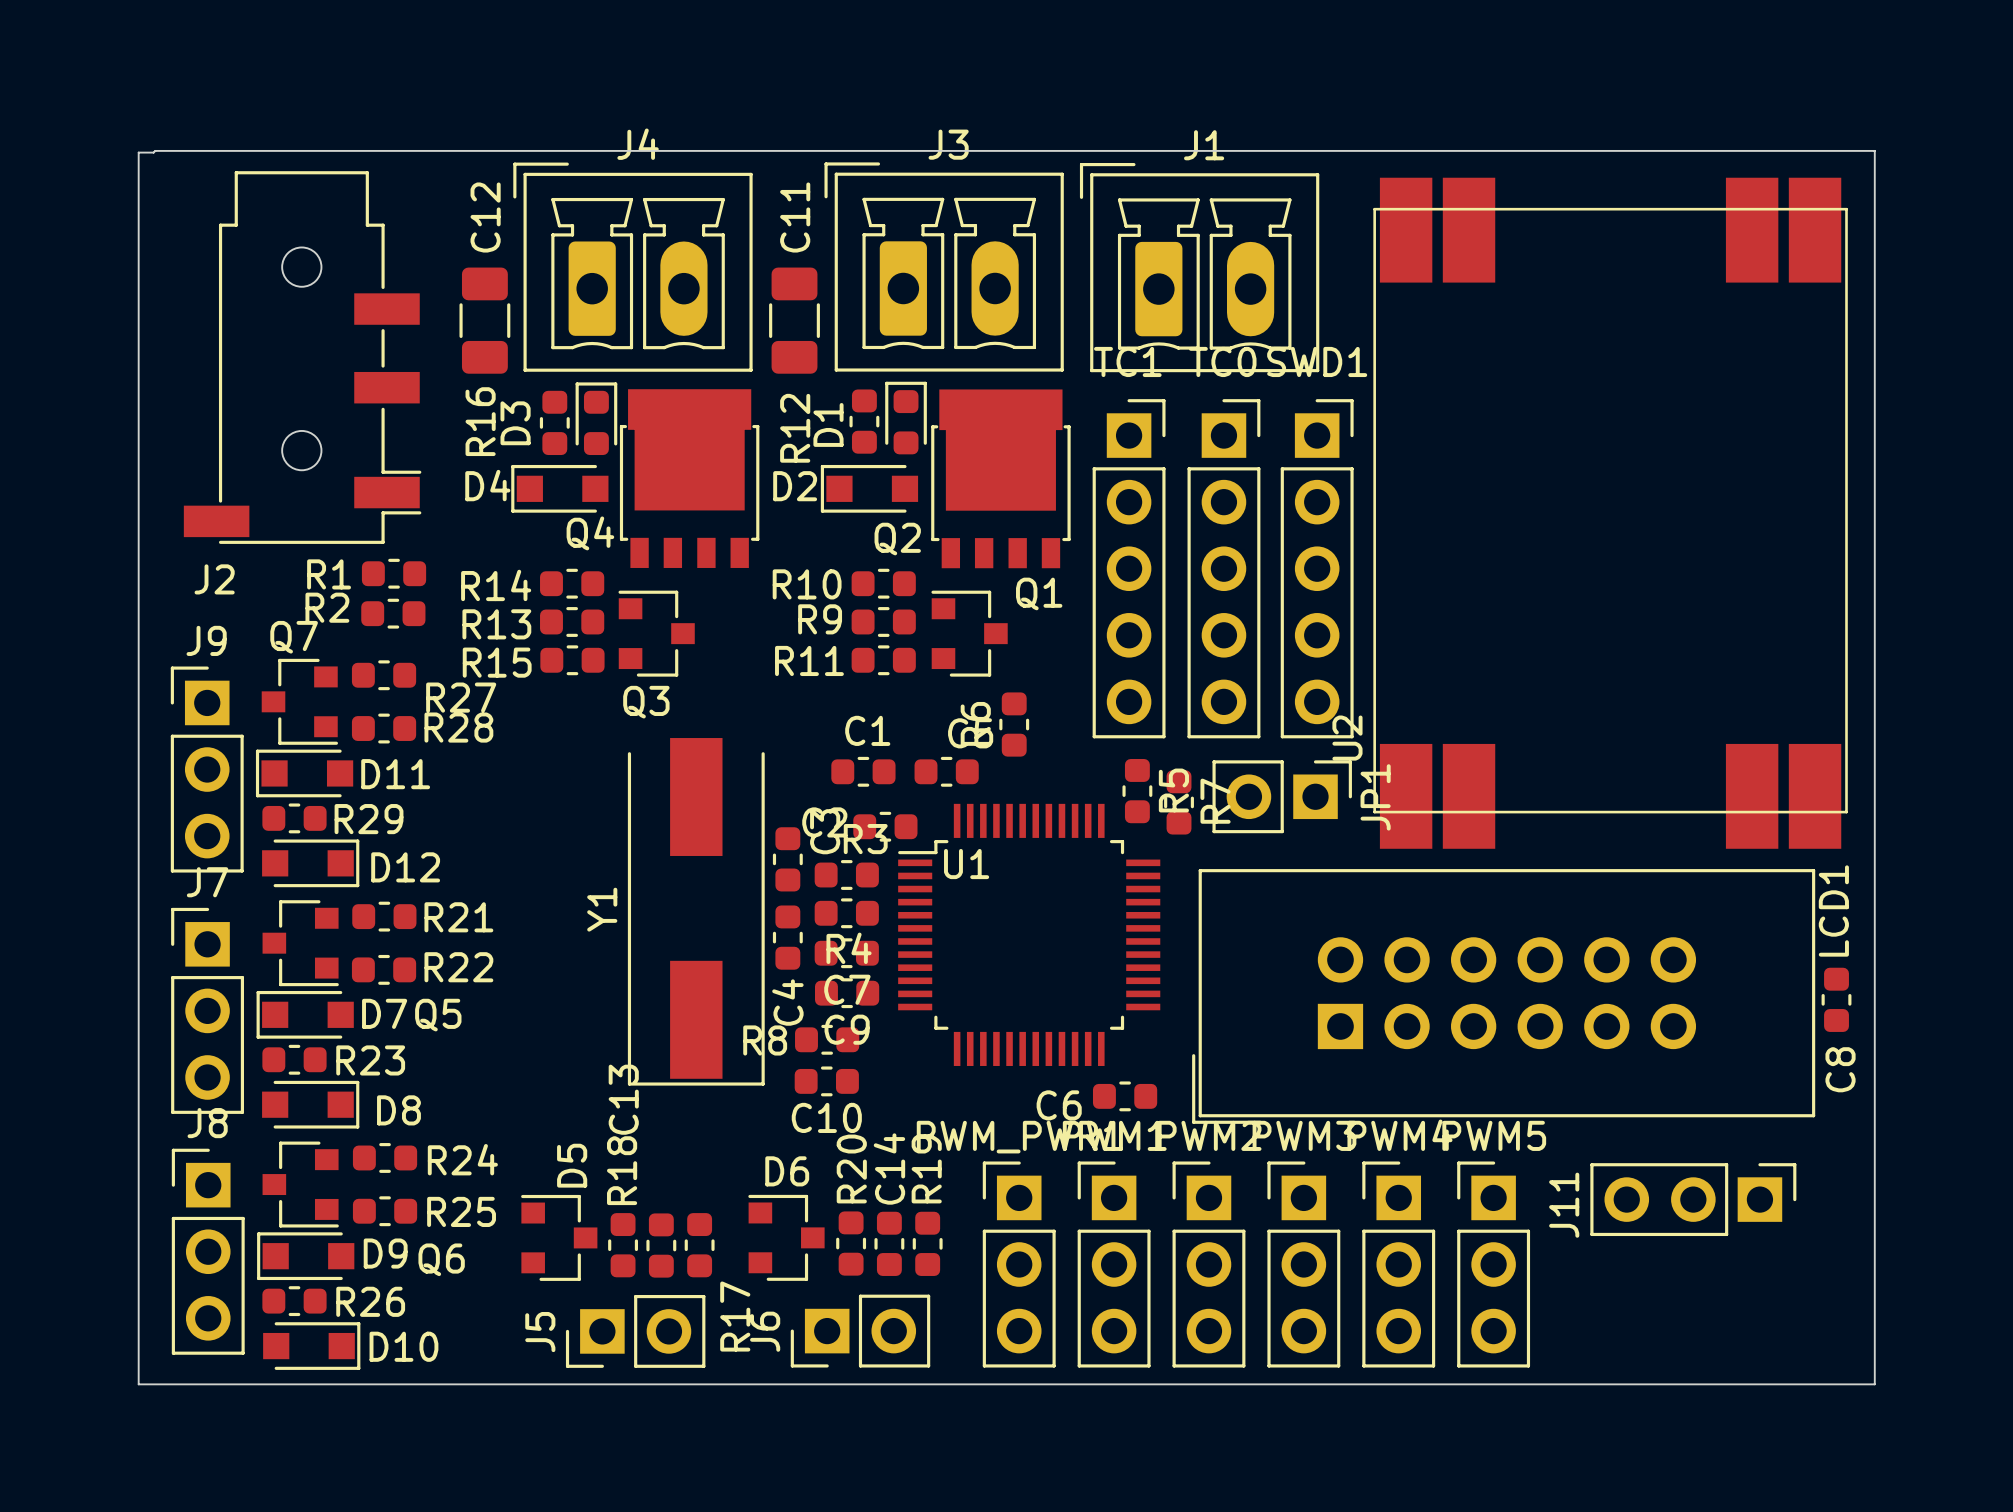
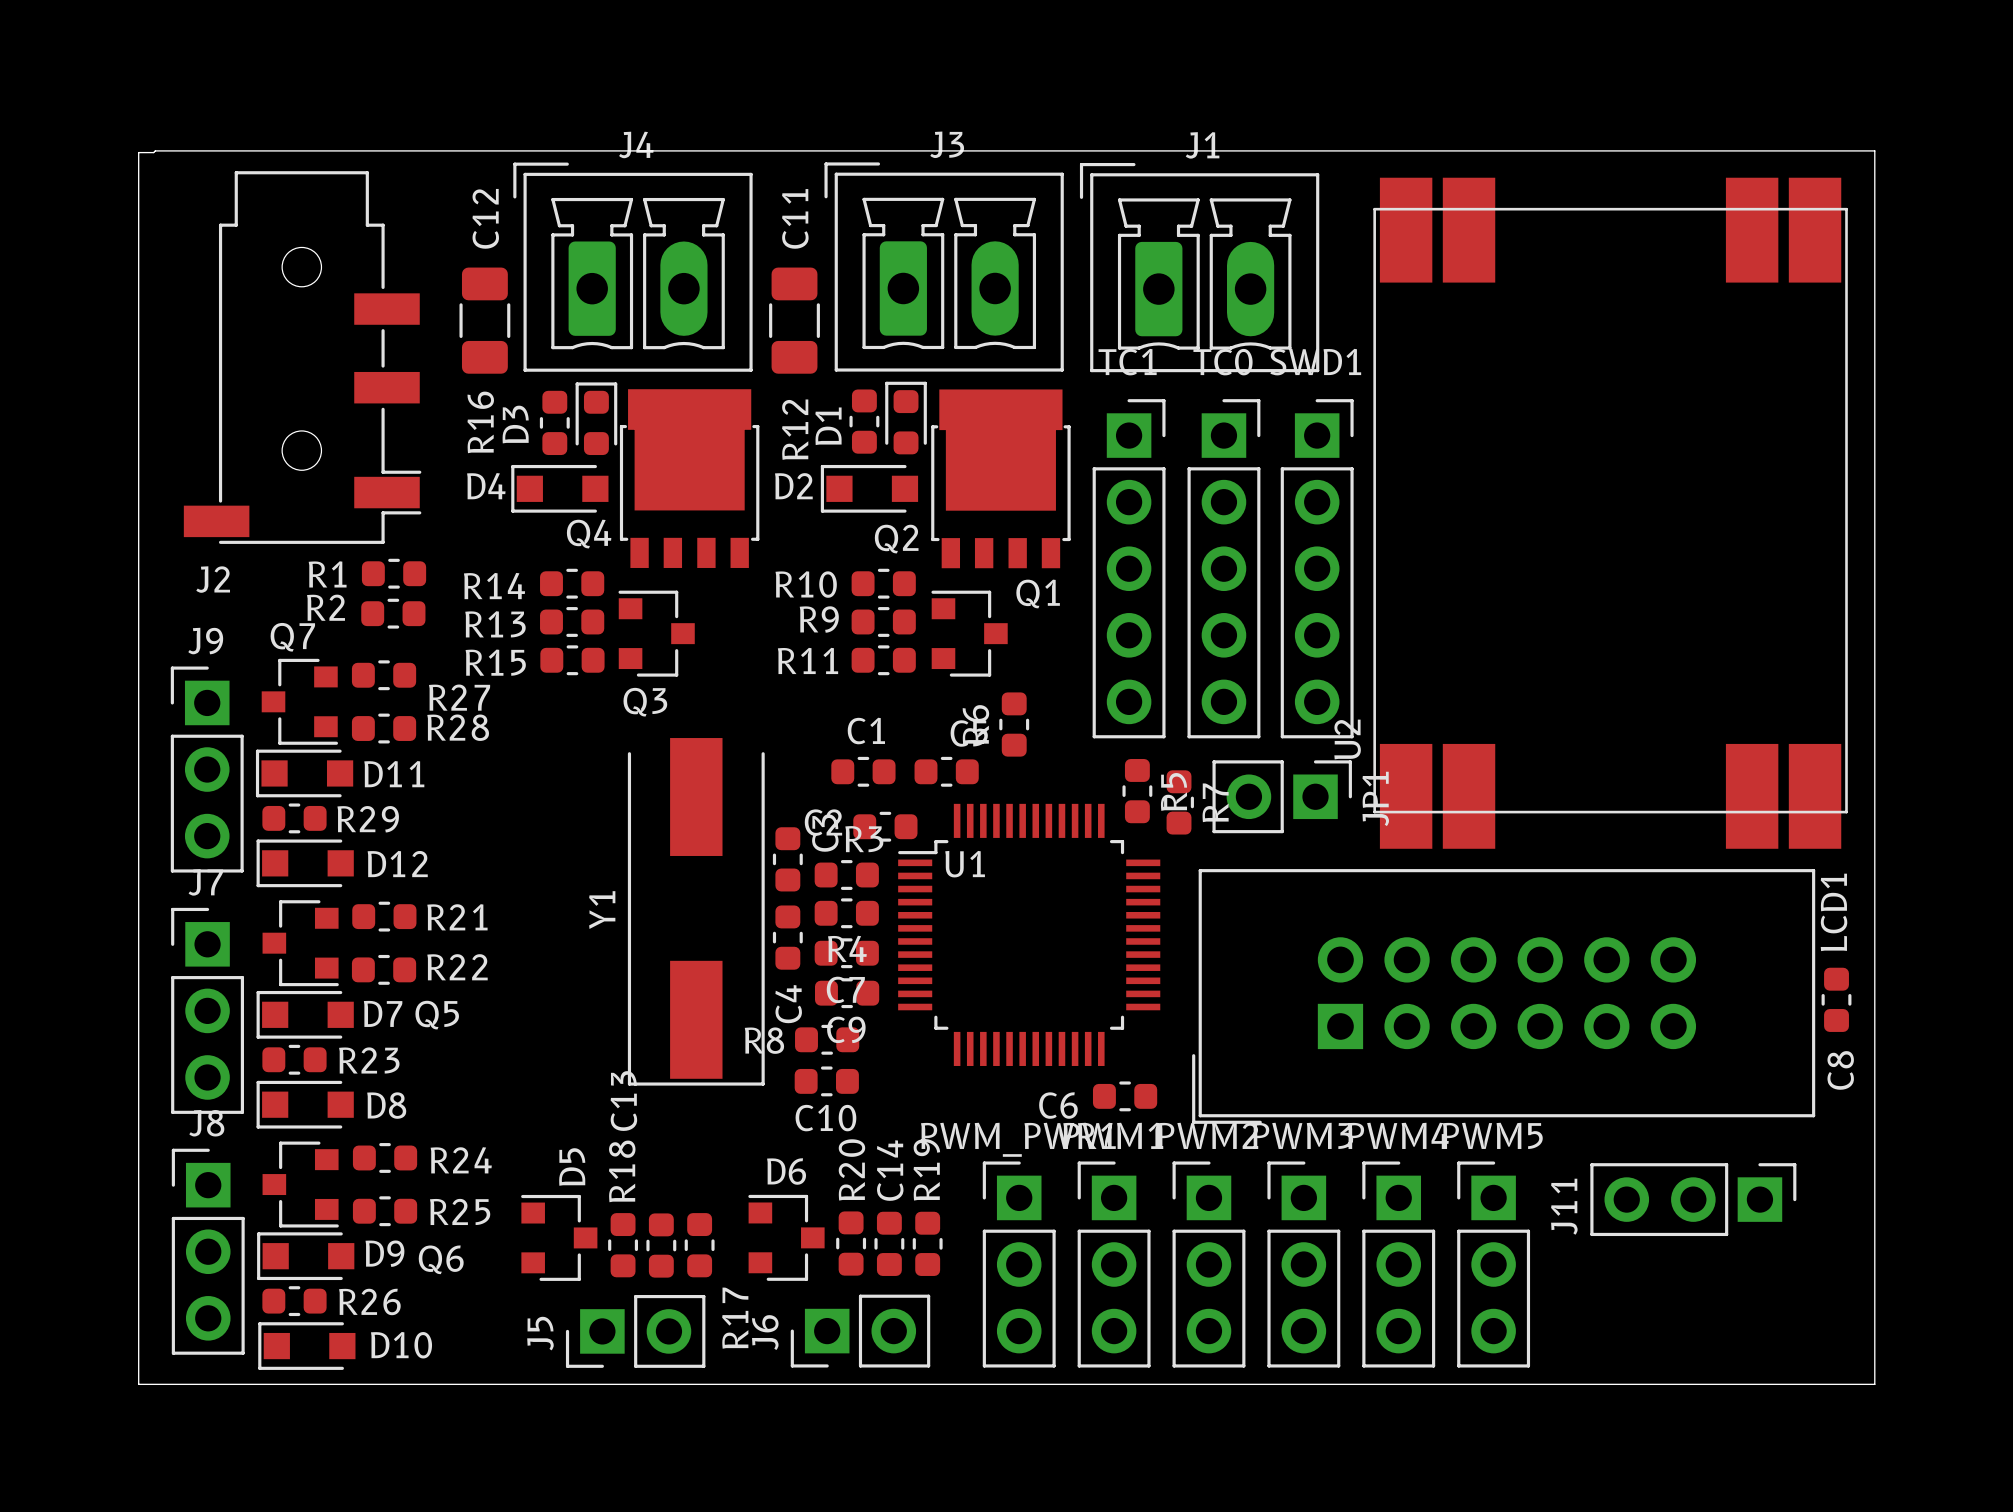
D12 rotation: 0° (310, 863) -> 180° (305, 863)
D8 rotation: 0° (310, 1104) -> 180° (305, 1104)
D10 rotation: 0° (311, 1346) -> 180° (306, 1346)

